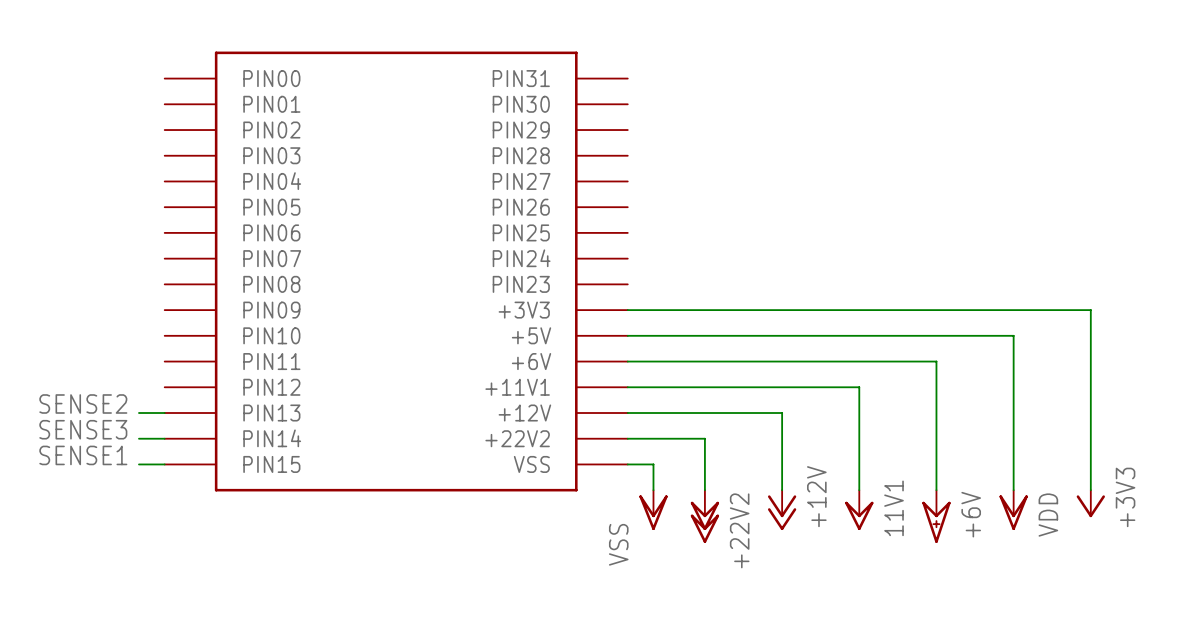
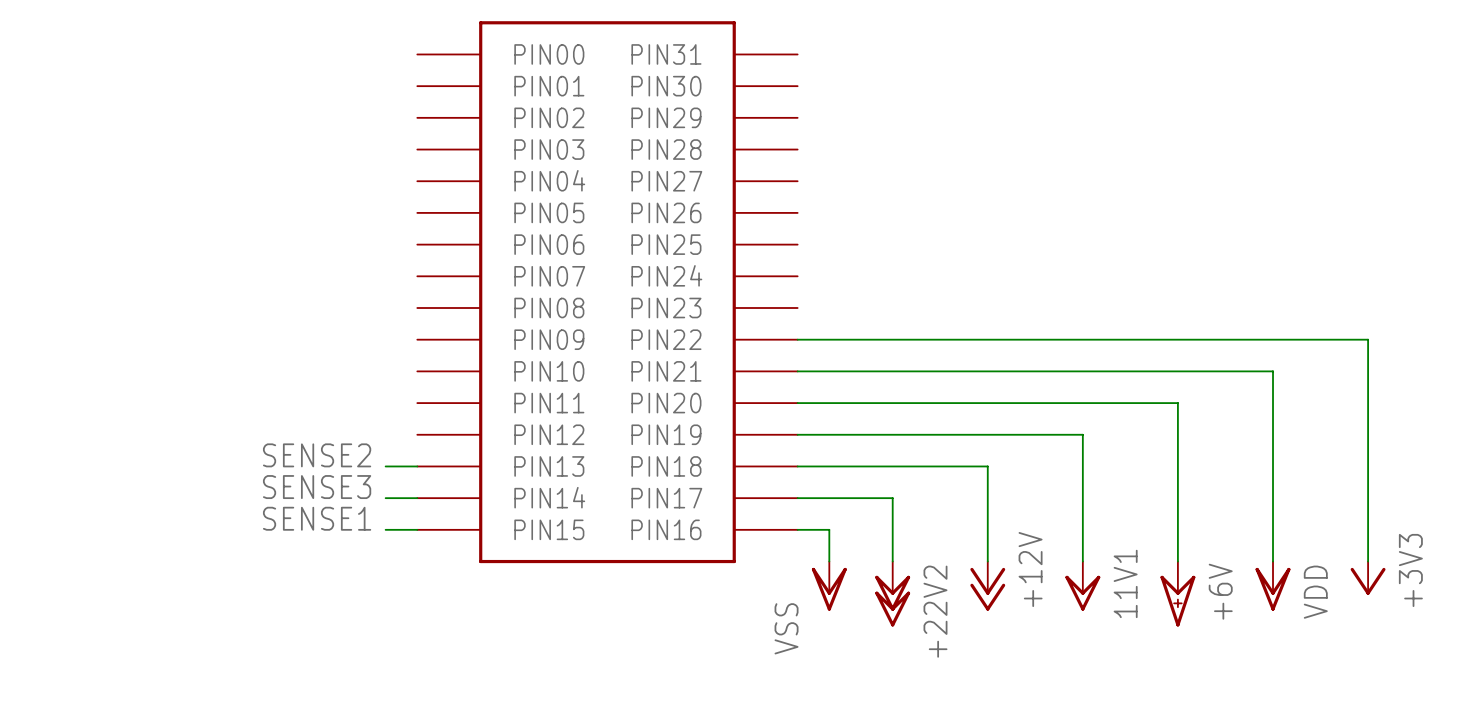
part: (396, 271) -> none
part: none -> (607, 292)
label position: SENSE2 (83, 403) -> SENSE2 (317, 455)
wire: (138, 413) (164, 413) -> (385, 466) (417, 466)
label position: SENSE3 (83, 429) -> SENSE3 (317, 487)
wire: (138, 438) (164, 438) -> (385, 498) (417, 498)
label position: SENSE1 (83, 455) -> SENSE1 (317, 518)
wire: (138, 464) (164, 464) -> (385, 529) (417, 529)

